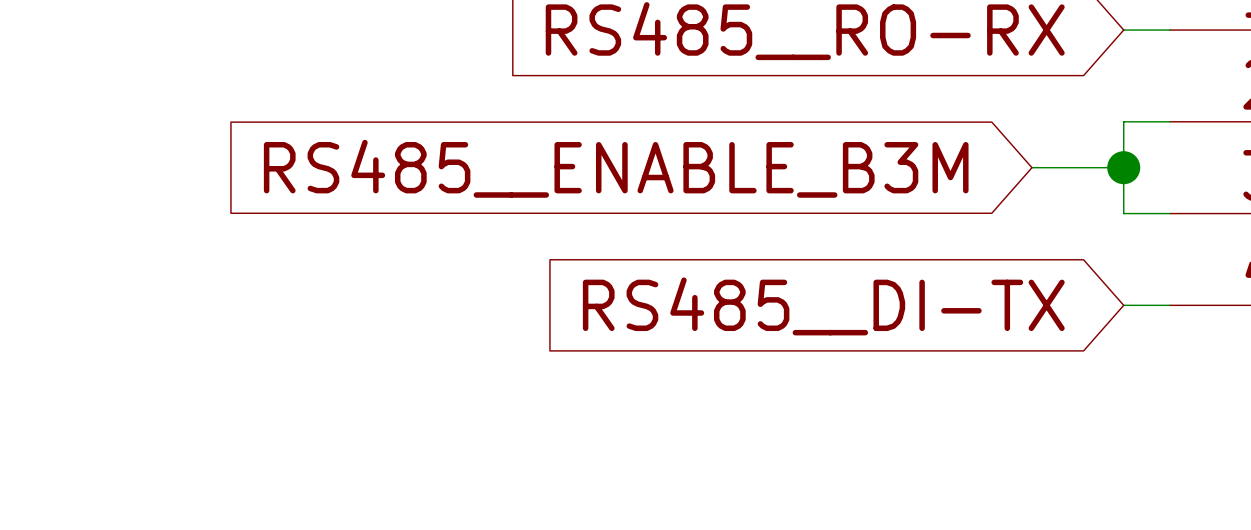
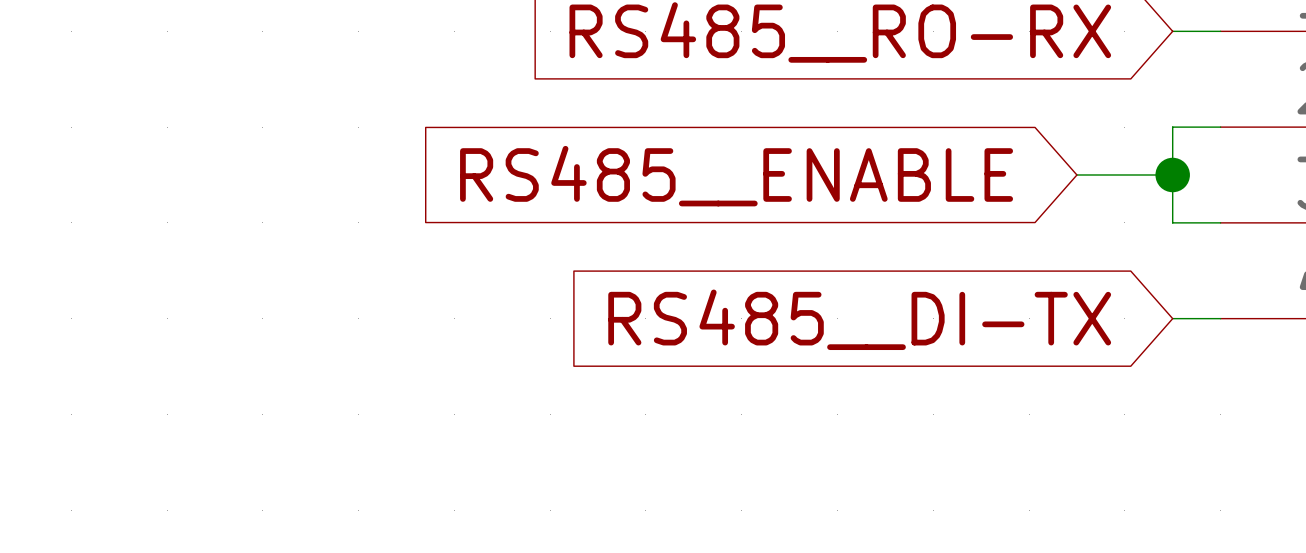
global label: RS485__ENABLE_B3M (616, 168) -> RS485__ENABLE (736, 176)

